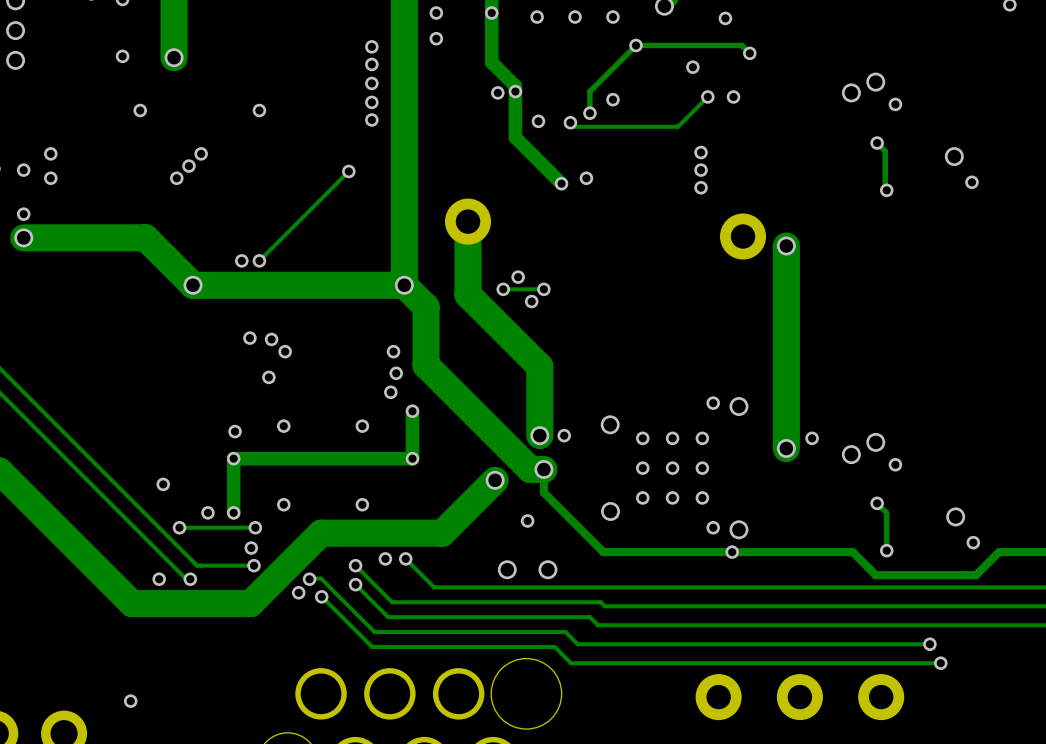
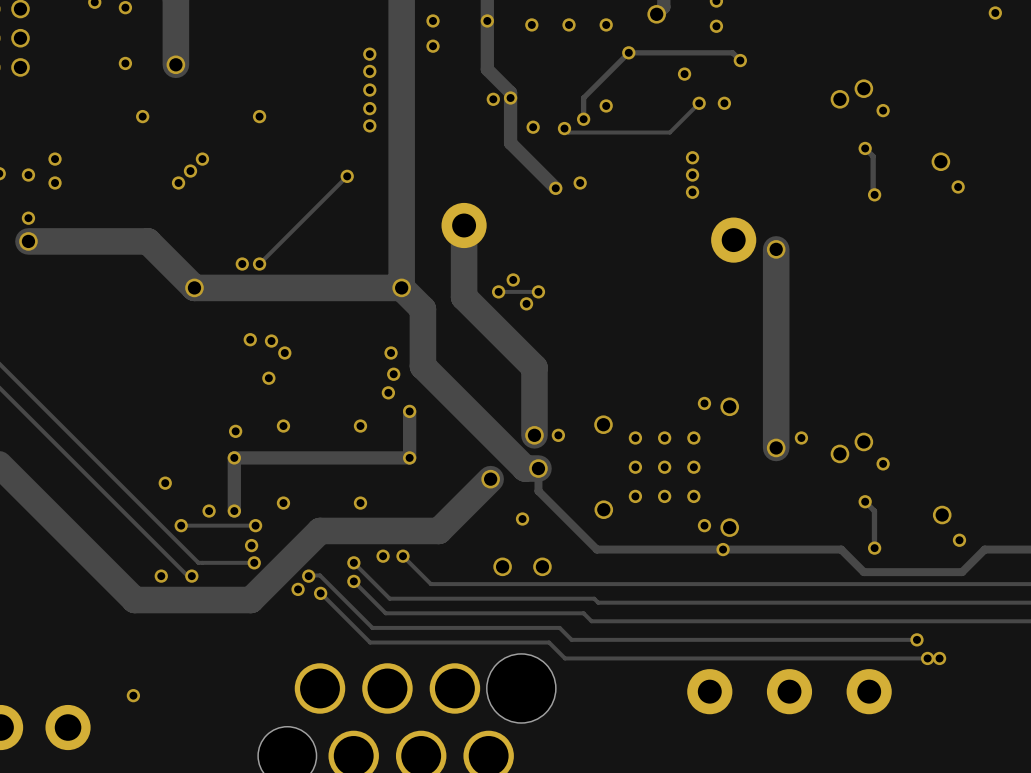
via: none -> (939, 658)

